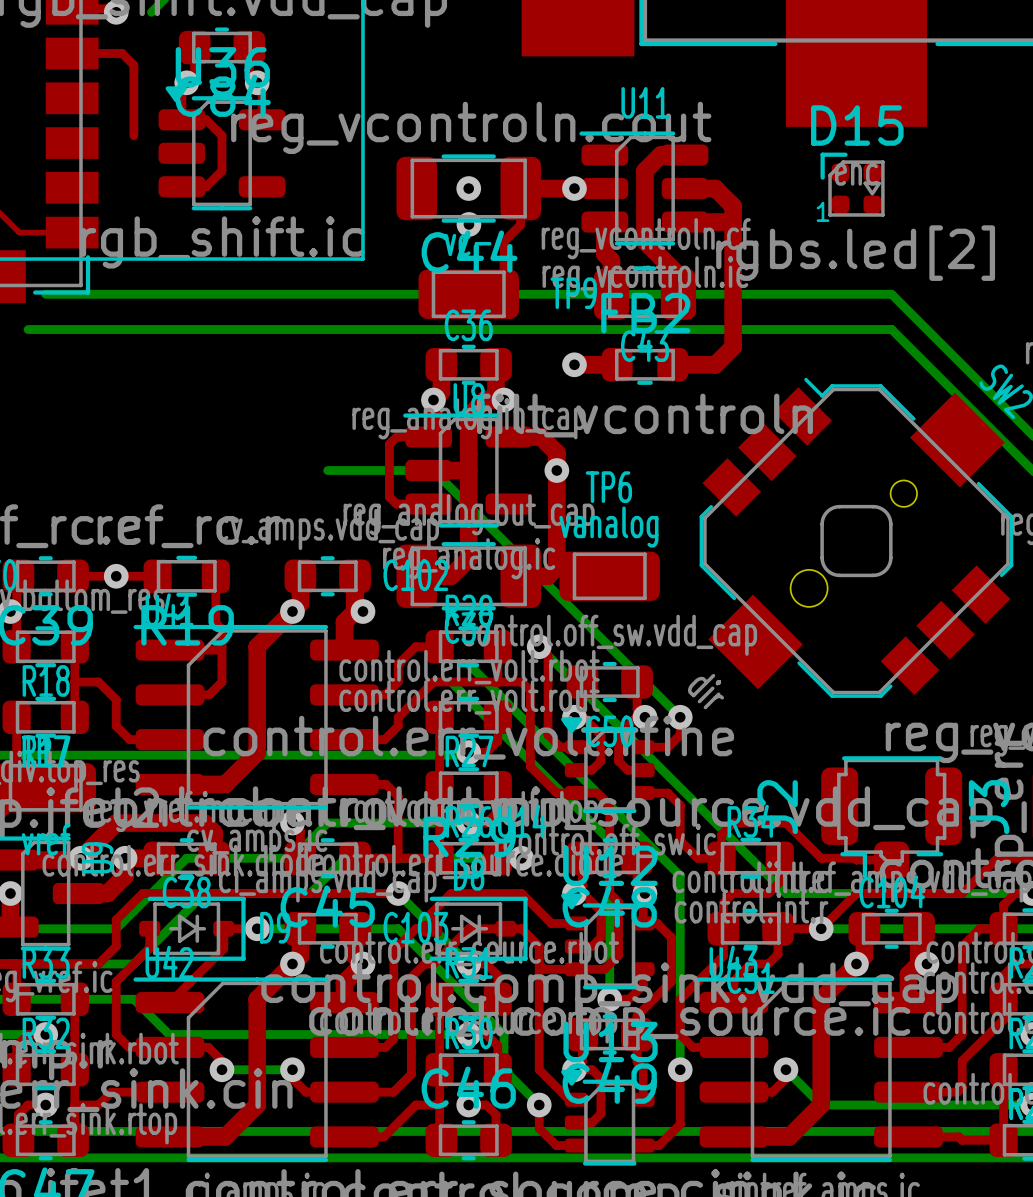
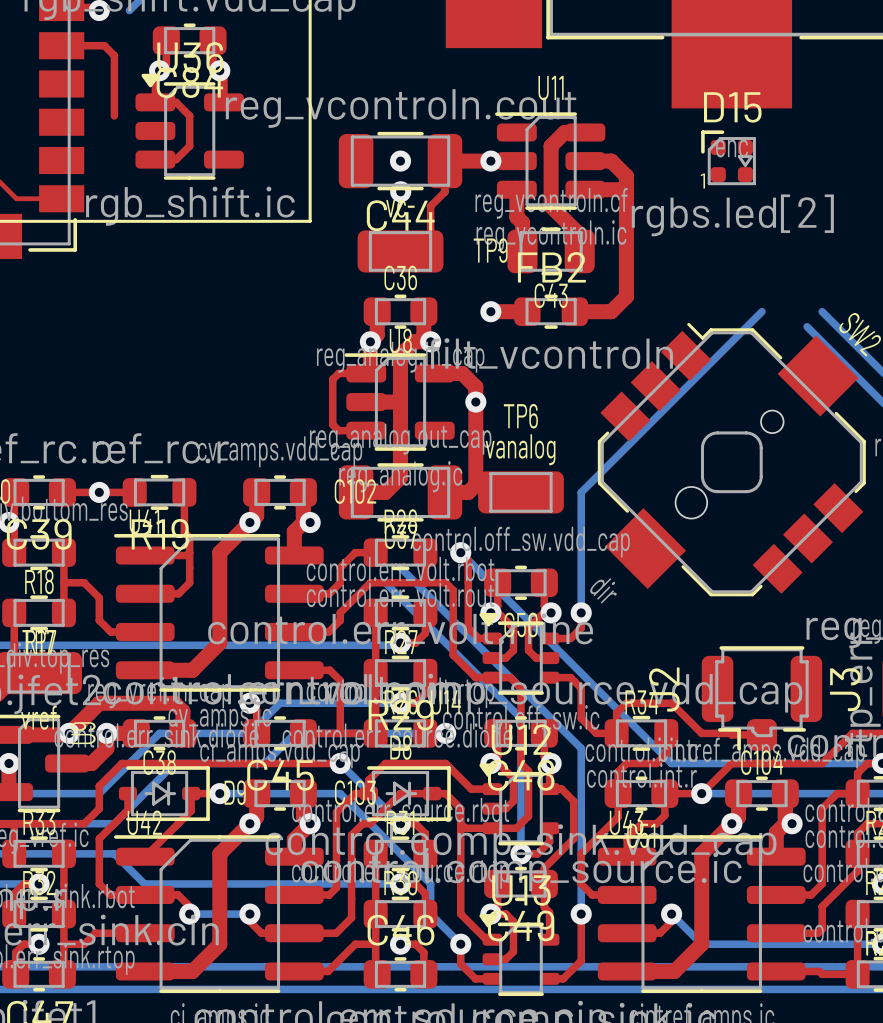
bottom track: (45, 294) (891, 294) (962, 364) -> none
bottom track: (28, 329) (891, 329) (944, 382) -> none
bottom track: (327, 470) (433, 470) (680, 717) -> (761, 311) (581, 492) (581, 612)

